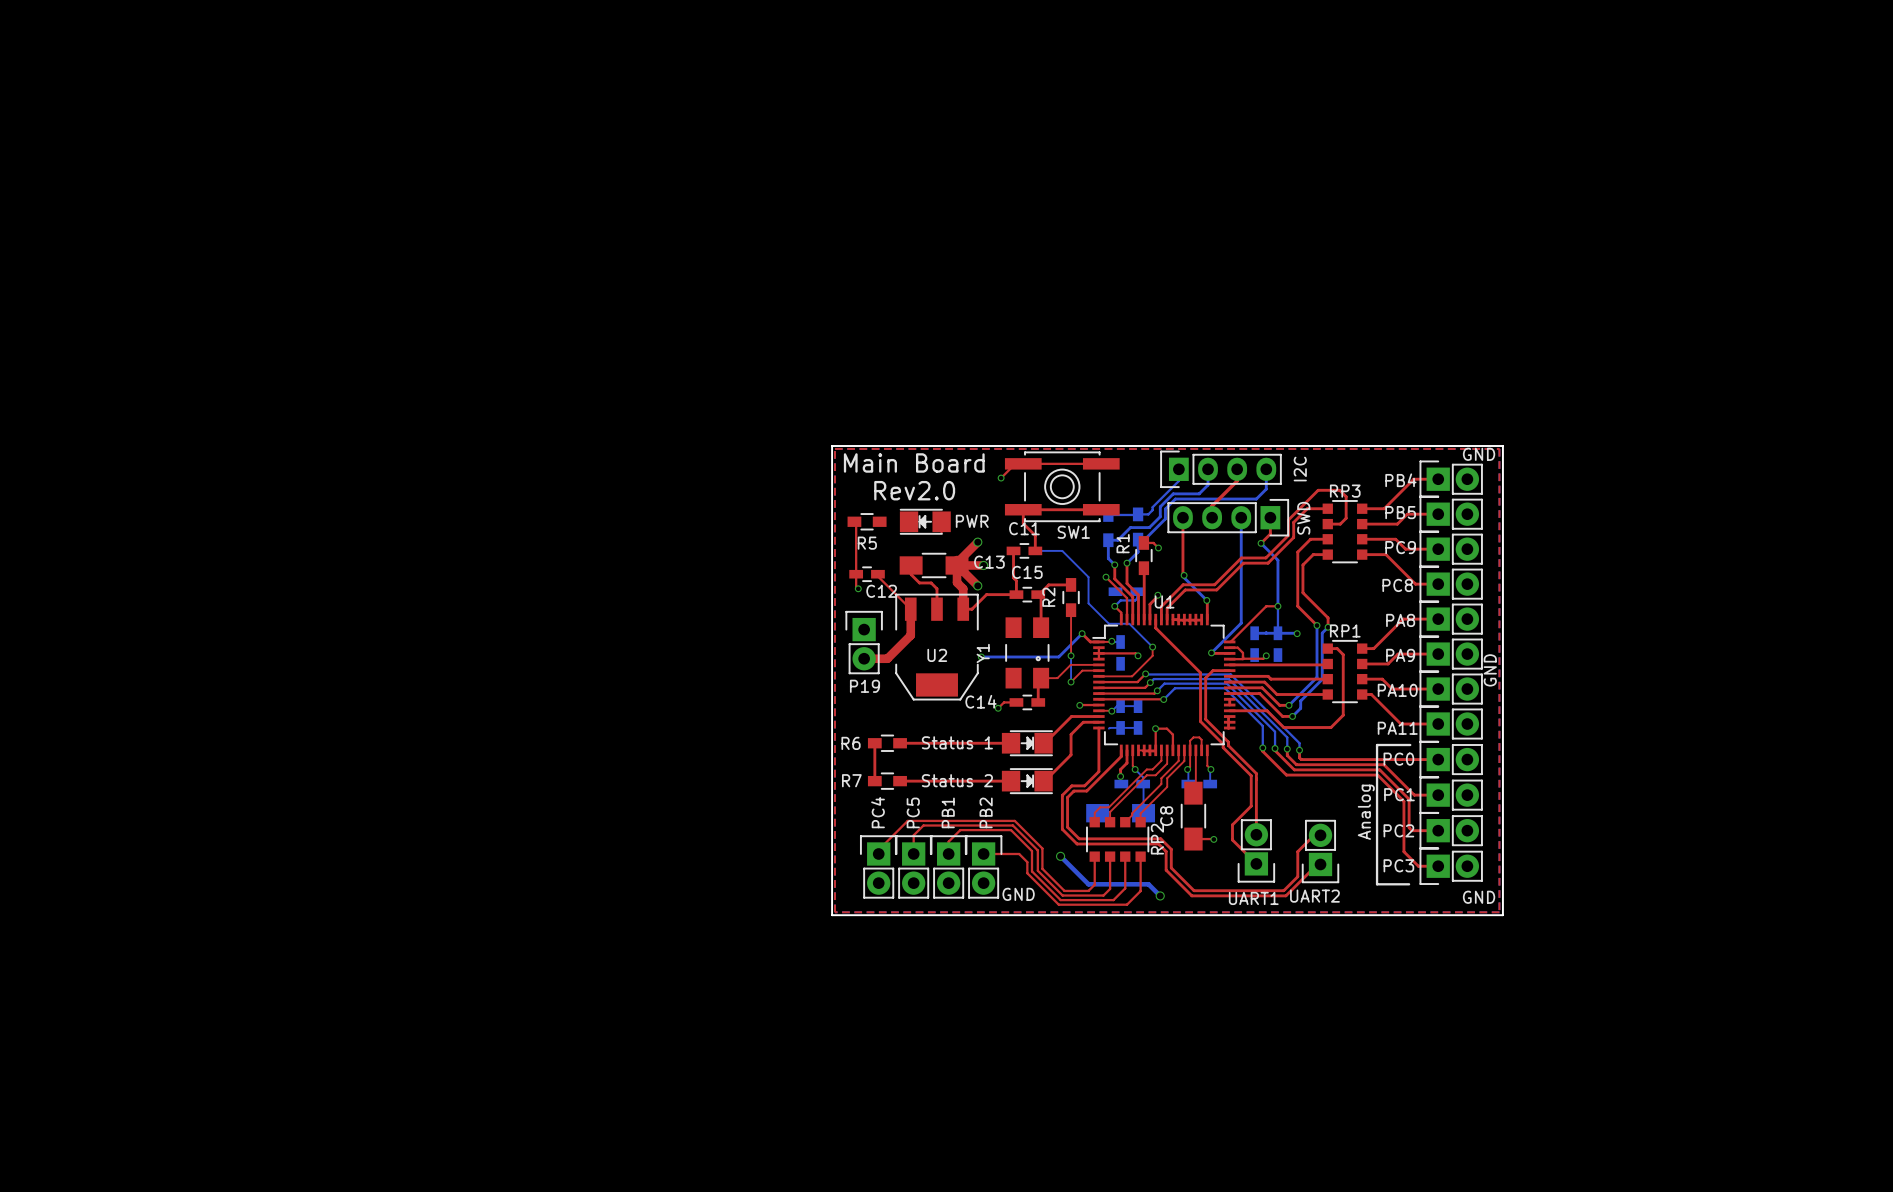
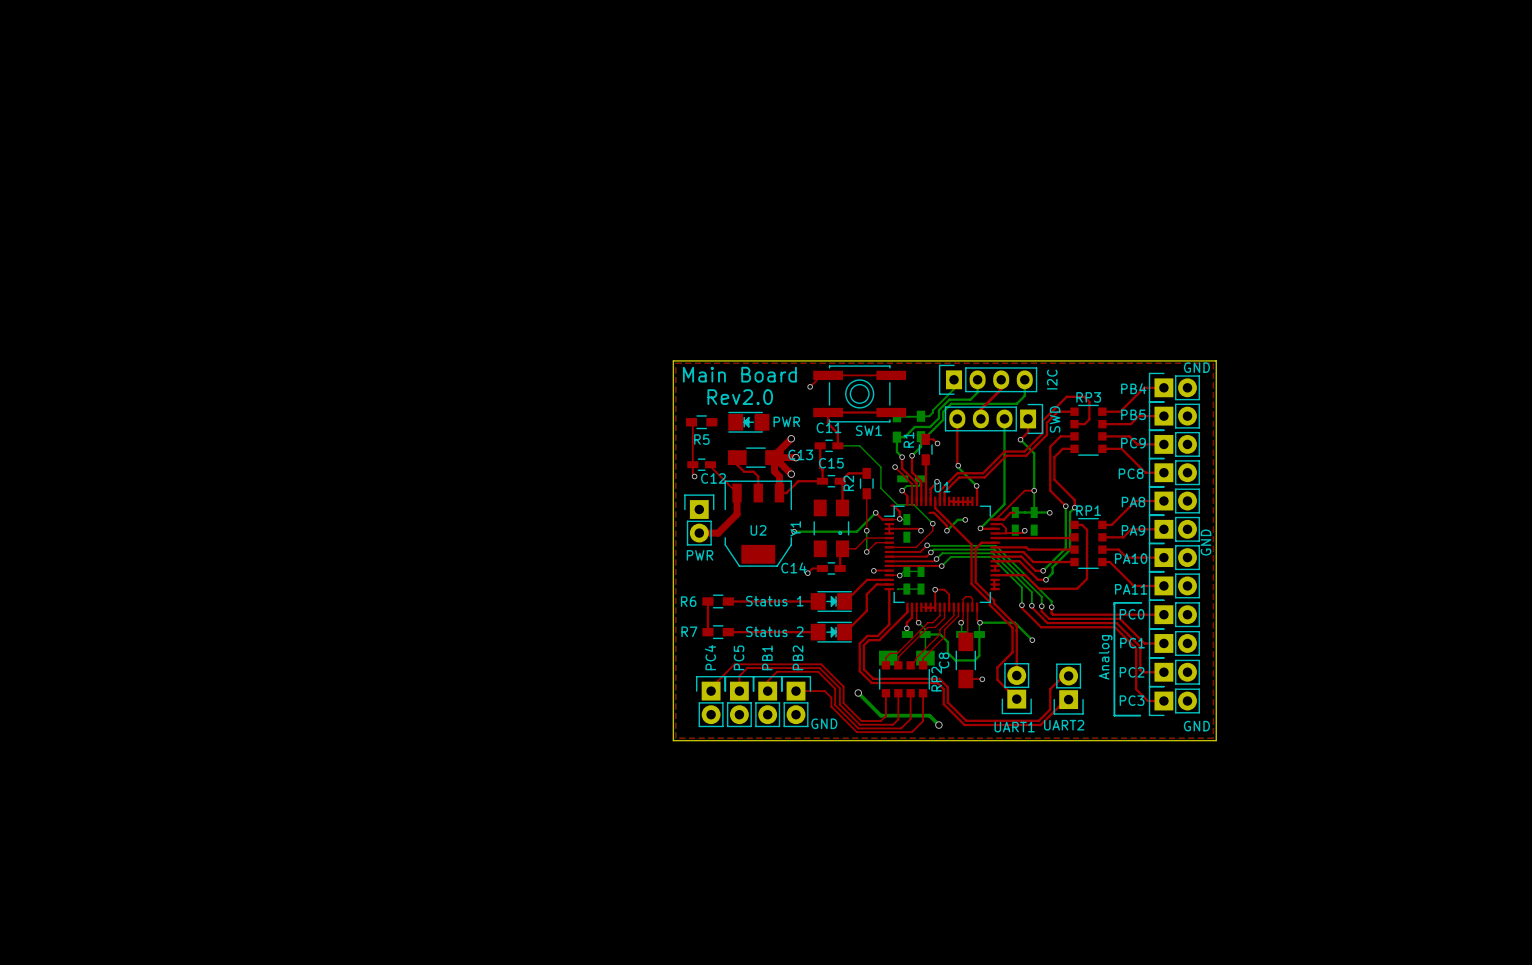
top track: none -> (891, 505) (899, 511) (899, 518)
top track: none -> (929, 512) (933, 512) (946, 525) (946, 530)
top track: none -> (1014, 512) (1010, 512) (1003, 519) (995, 519)
bottom track: none -> (965, 519) (957, 519) (946, 530)
via: none -> (965, 519)
via: none -> (946, 530)
P19 name: P19 (864, 686) -> PWR (700, 555)
bottom track: none -> (979, 622) (1014, 622) (1032, 640)
bottom track: none -> (925, 634) (940, 634) (947, 642) (947, 652) (955, 660) (974, 660) (979, 655) (979, 634)
via: none -> (1032, 640)

